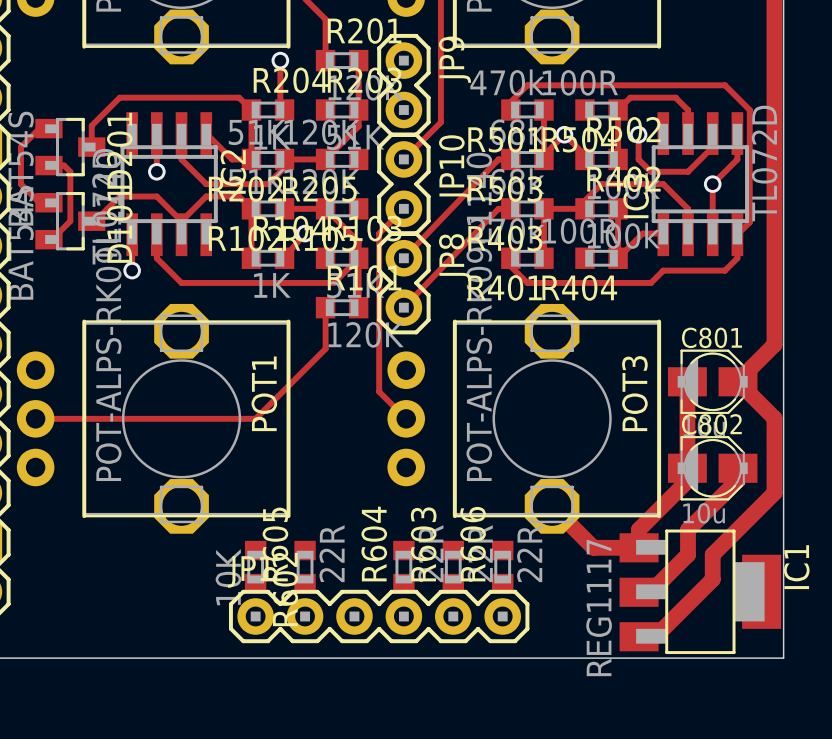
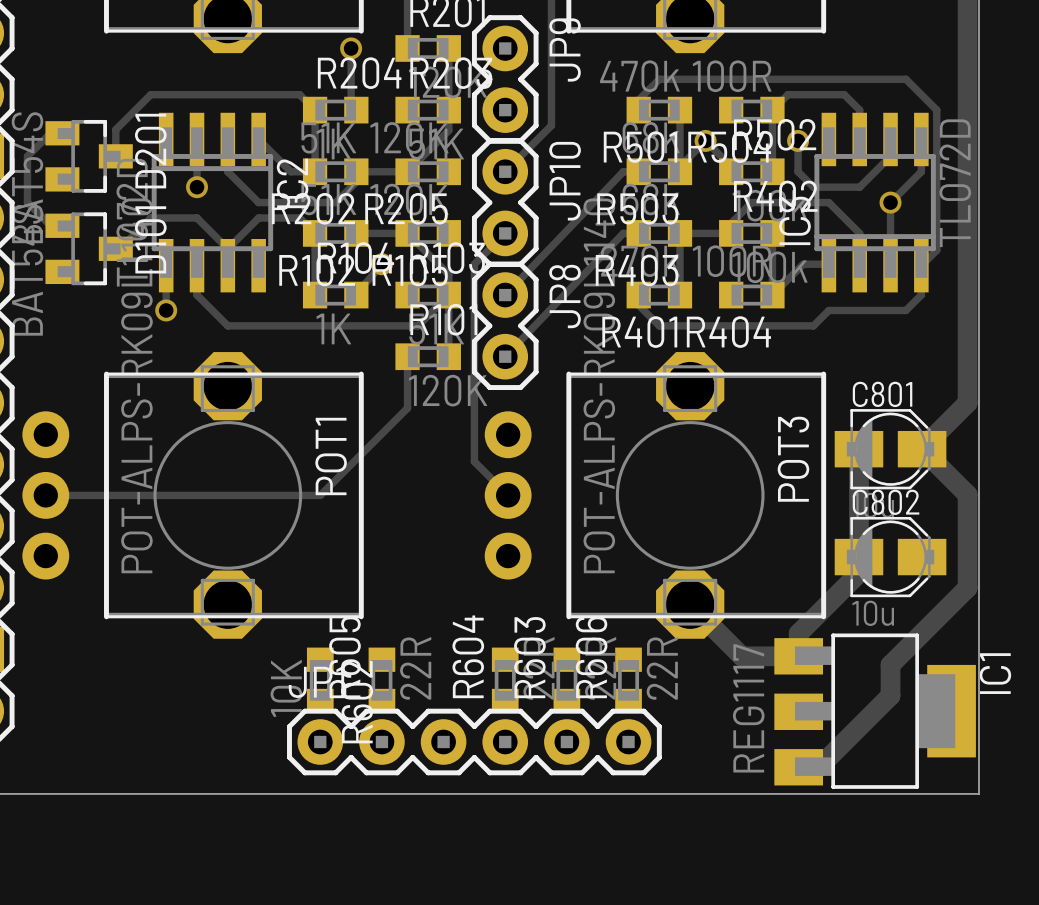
track: (48, 165) (64, 165) (70, 171) (70, 221) (58, 233) -> none
track: (738, 468) (738, 480) (688, 530) (688, 554) (650, 592) (639, 592) -> none

